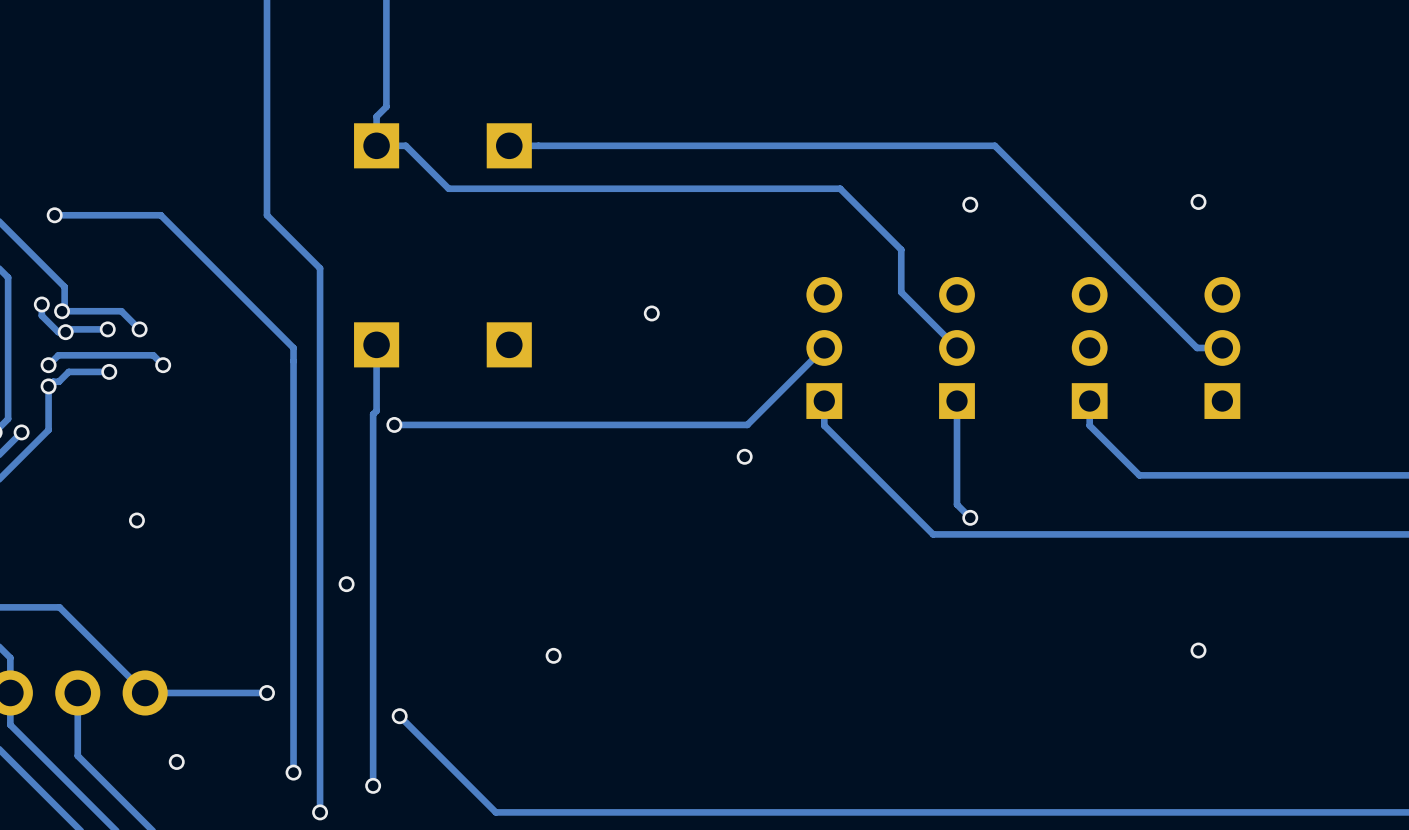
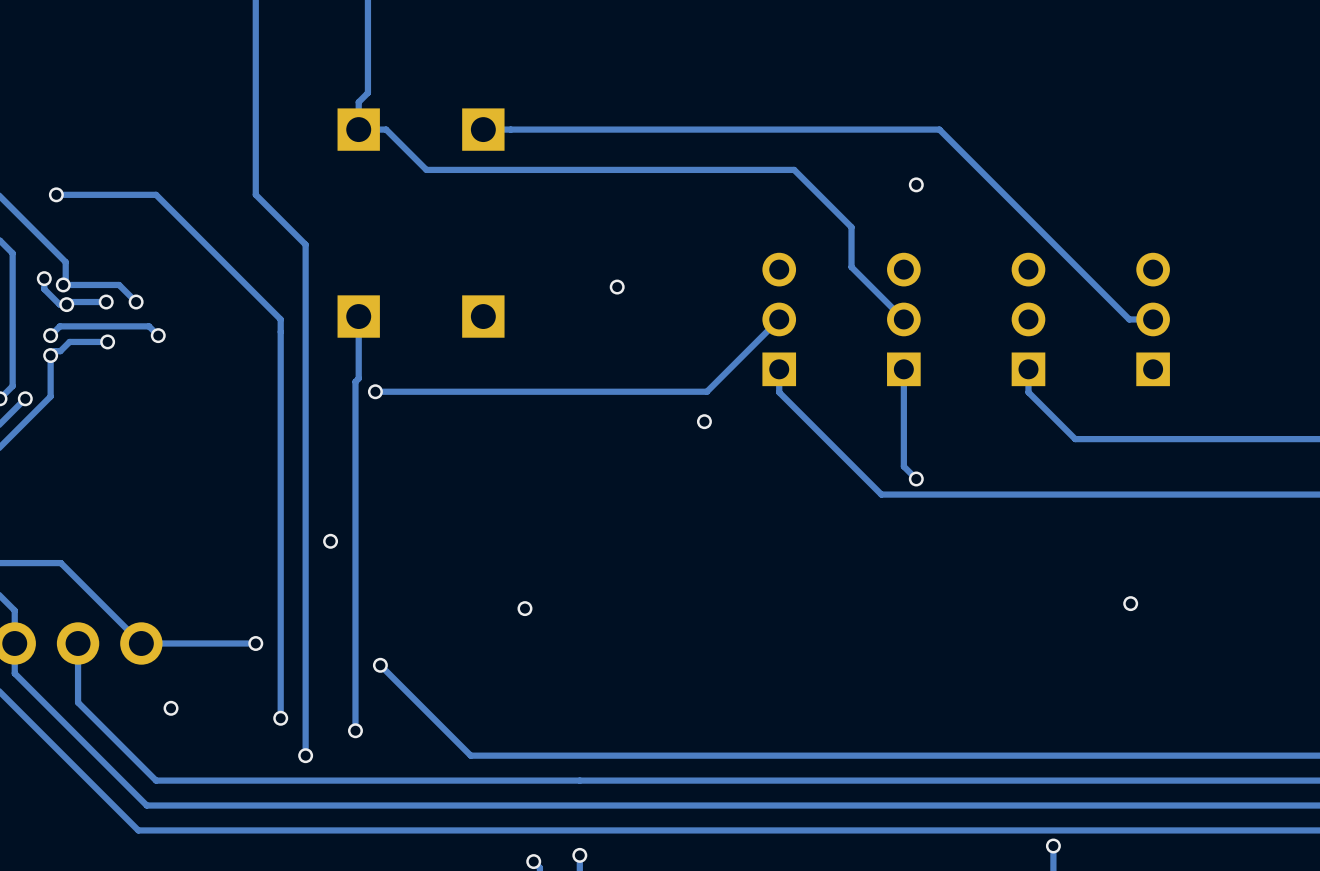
via: (1198, 202) -> none
via: (136, 520) -> none

